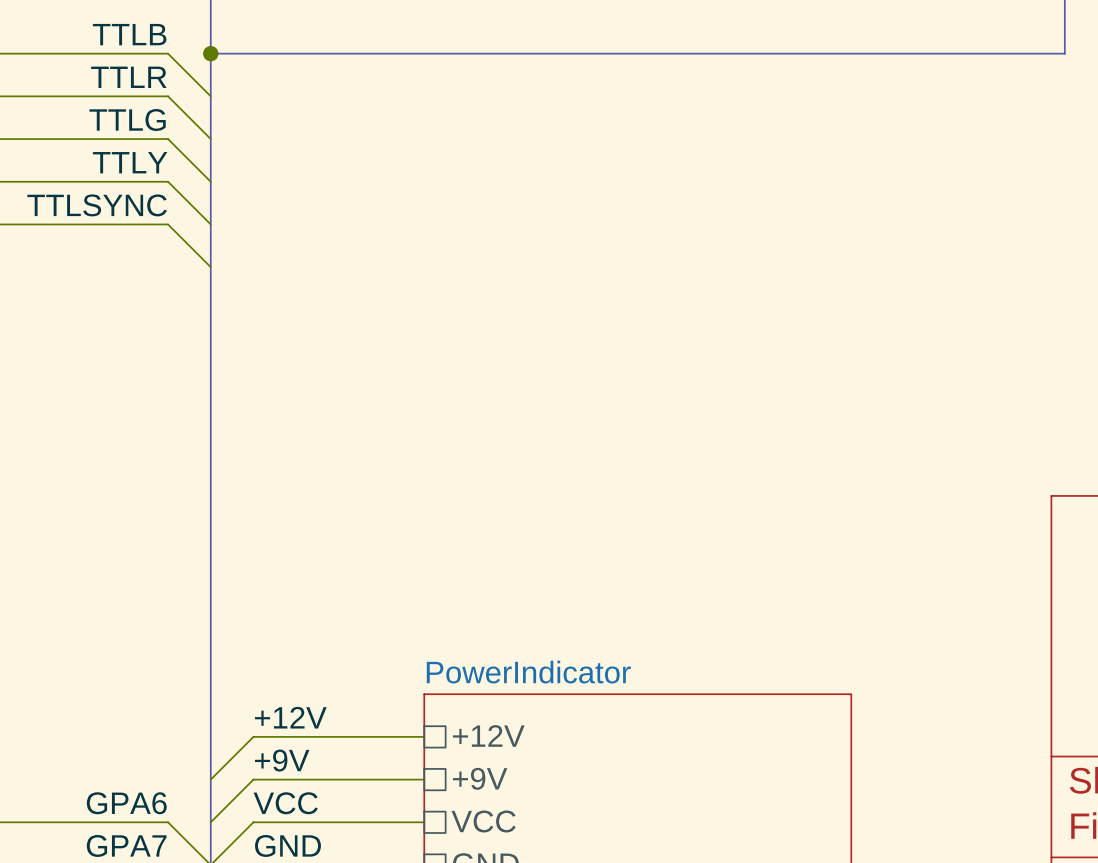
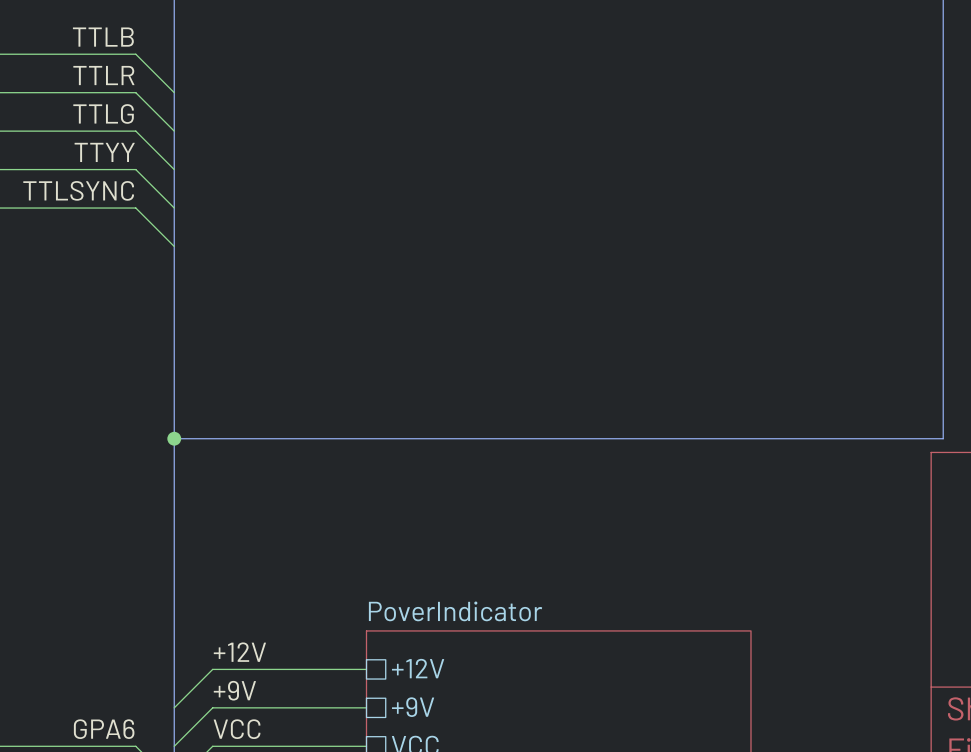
bus: (210, 53) (1064, 53) -> (174, 438) (943, 438) (943, 54)
junction: (210, 53) -> none
label: TTLY (130, 162) -> TTYY (104, 152)
junction: none -> (174, 438)
sheet PowerIndicator name: PowerIndicator (528, 672) -> PoverIndicator (455, 611)

